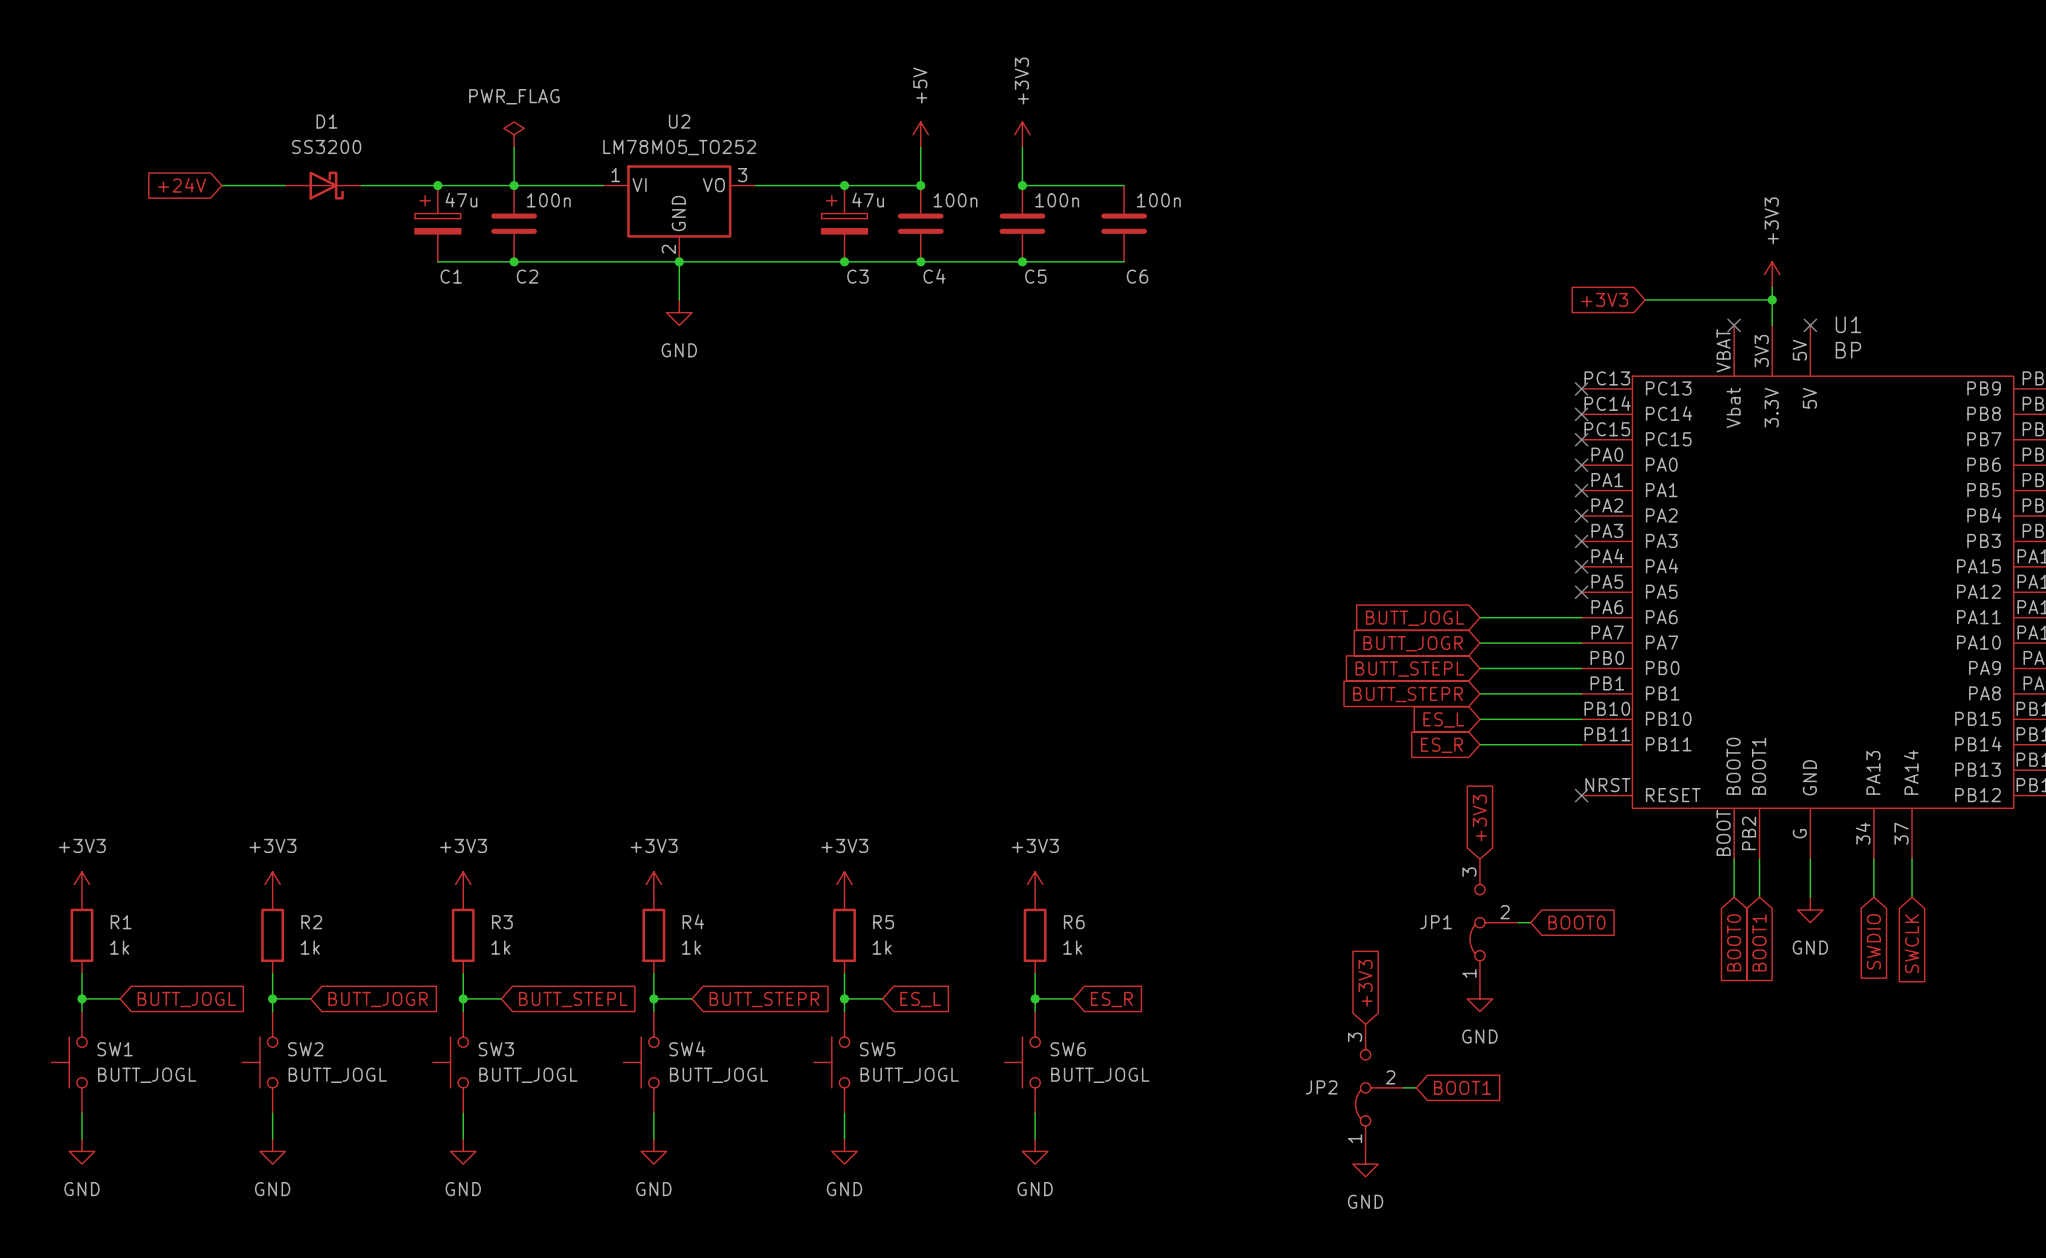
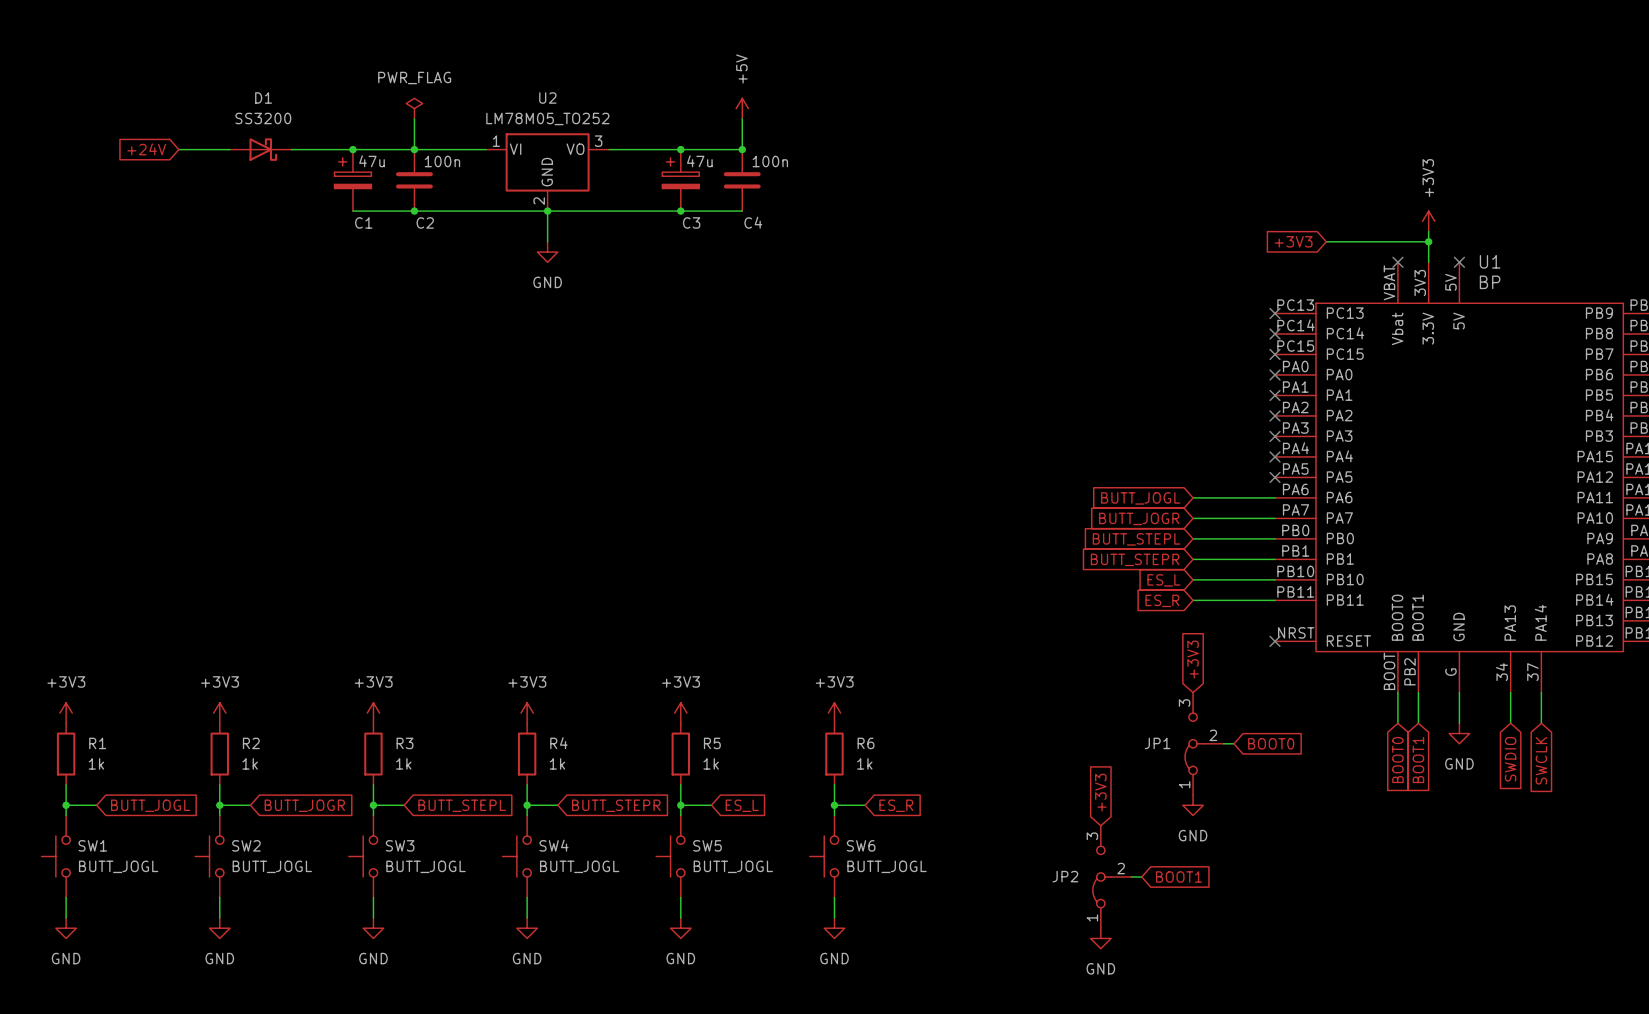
power symbol: +3V3 (1022, 134) -> none
wire: (1022, 147) (1022, 185) (1124, 185) -> none
junction: (1022, 185) -> none
C5: 100n (1022, 223) -> none
C6: 100n (1124, 223) -> none
wire: (920, 261) (1124, 261) -> none
junction: (920, 261) -> none
junction: (1022, 261) -> none

